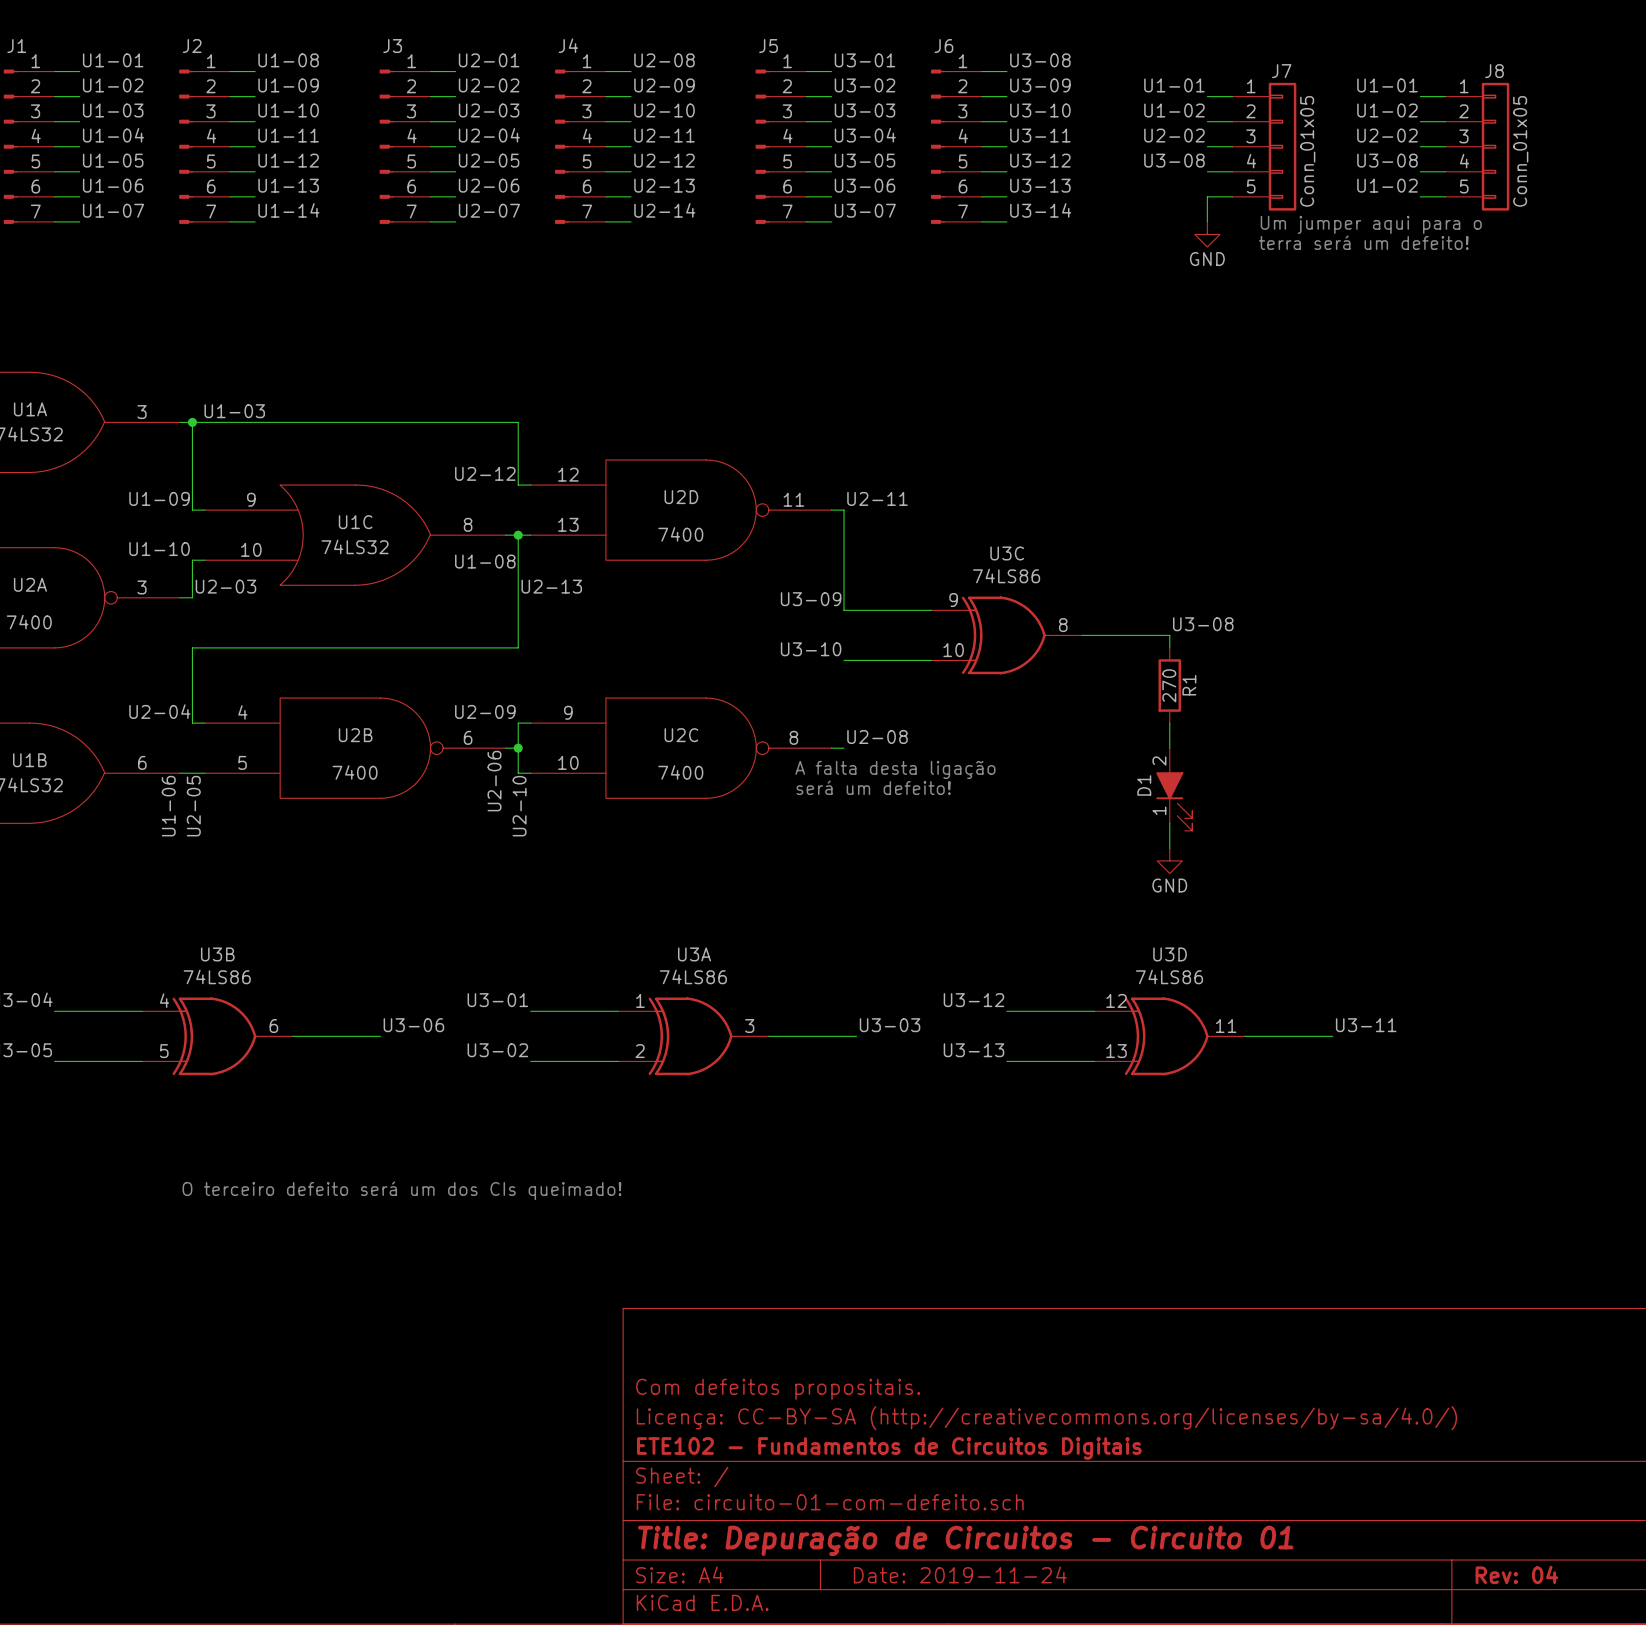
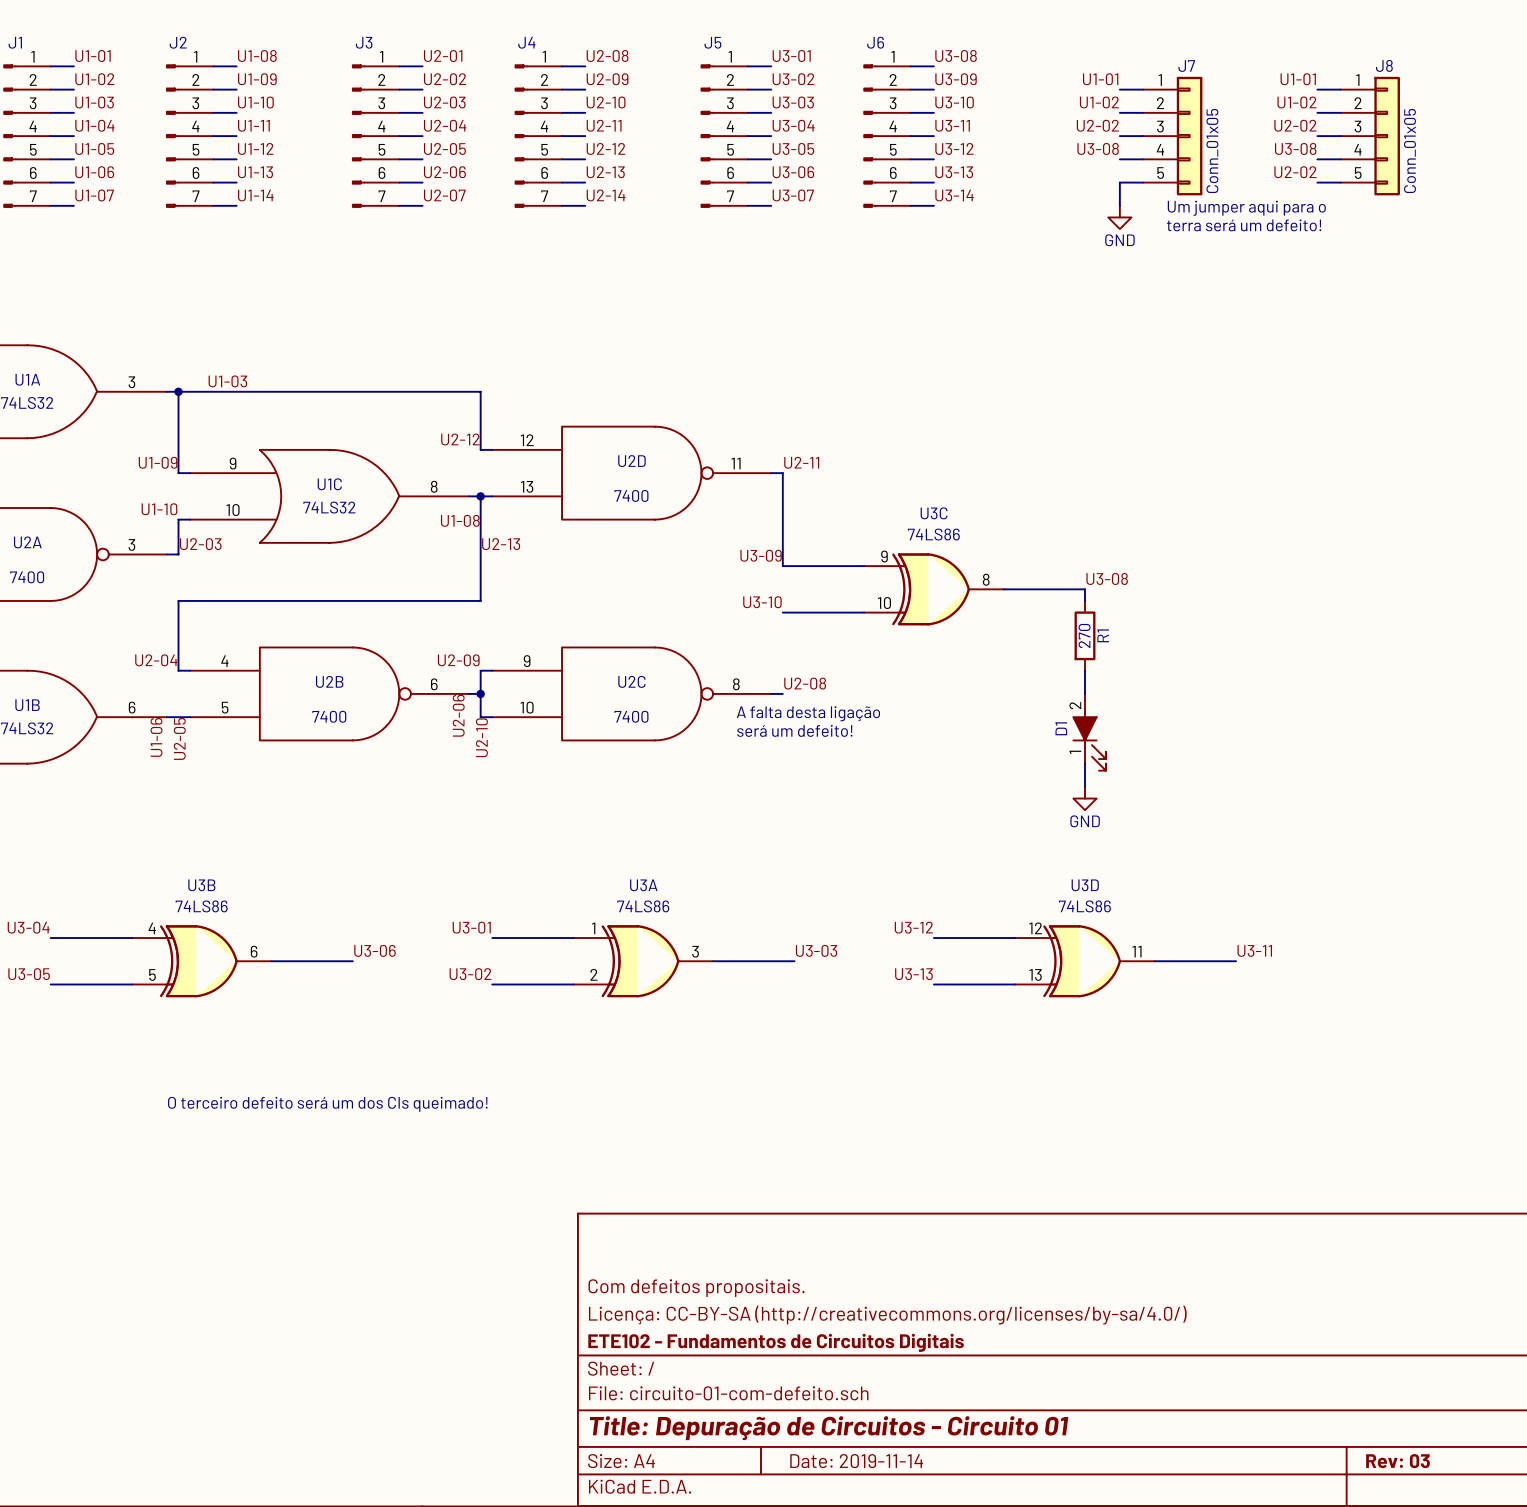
label: U1-02 (1387, 185) -> U2-02 (1295, 172)
title block: Date: 2019-11-24 (960, 1574) -> Date: 2019-11-14 (856, 1461)
title block: Rev: 04 (1516, 1574) -> Rev: 03 (1398, 1461)

